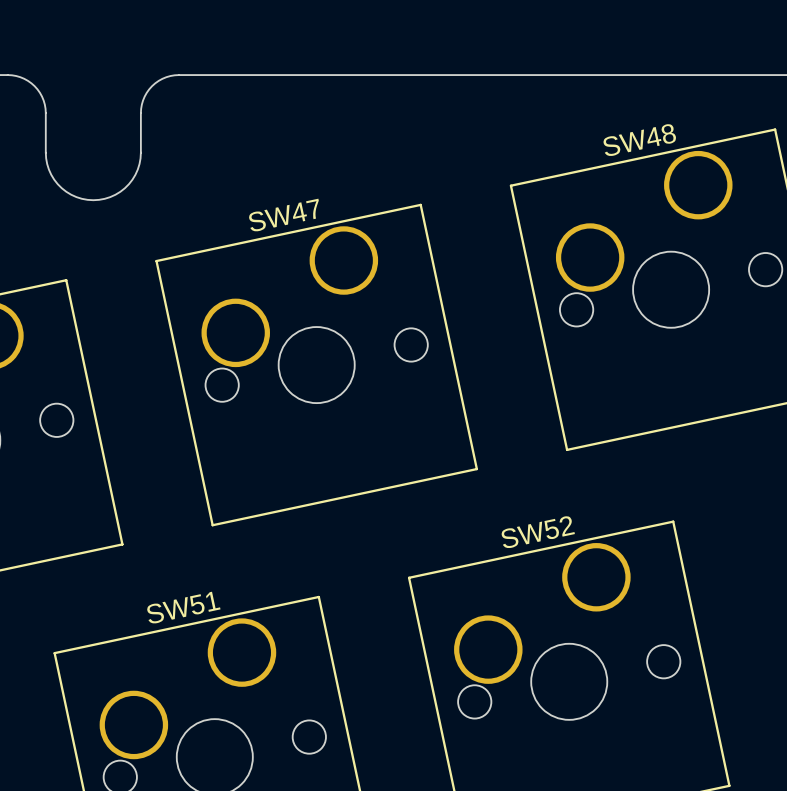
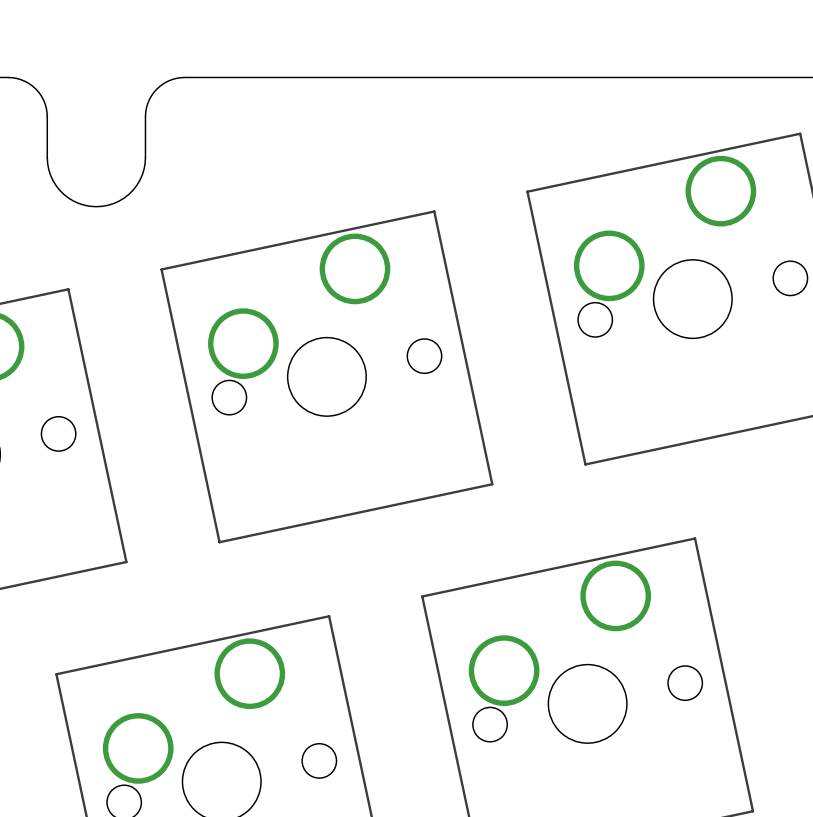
SW48 name: SW48 (639, 140) -> none
SW47 name: SW47 (283, 215) -> none
SW52 name: SW52 (538, 532) -> none
SW51 name: SW51 (183, 608) -> none

